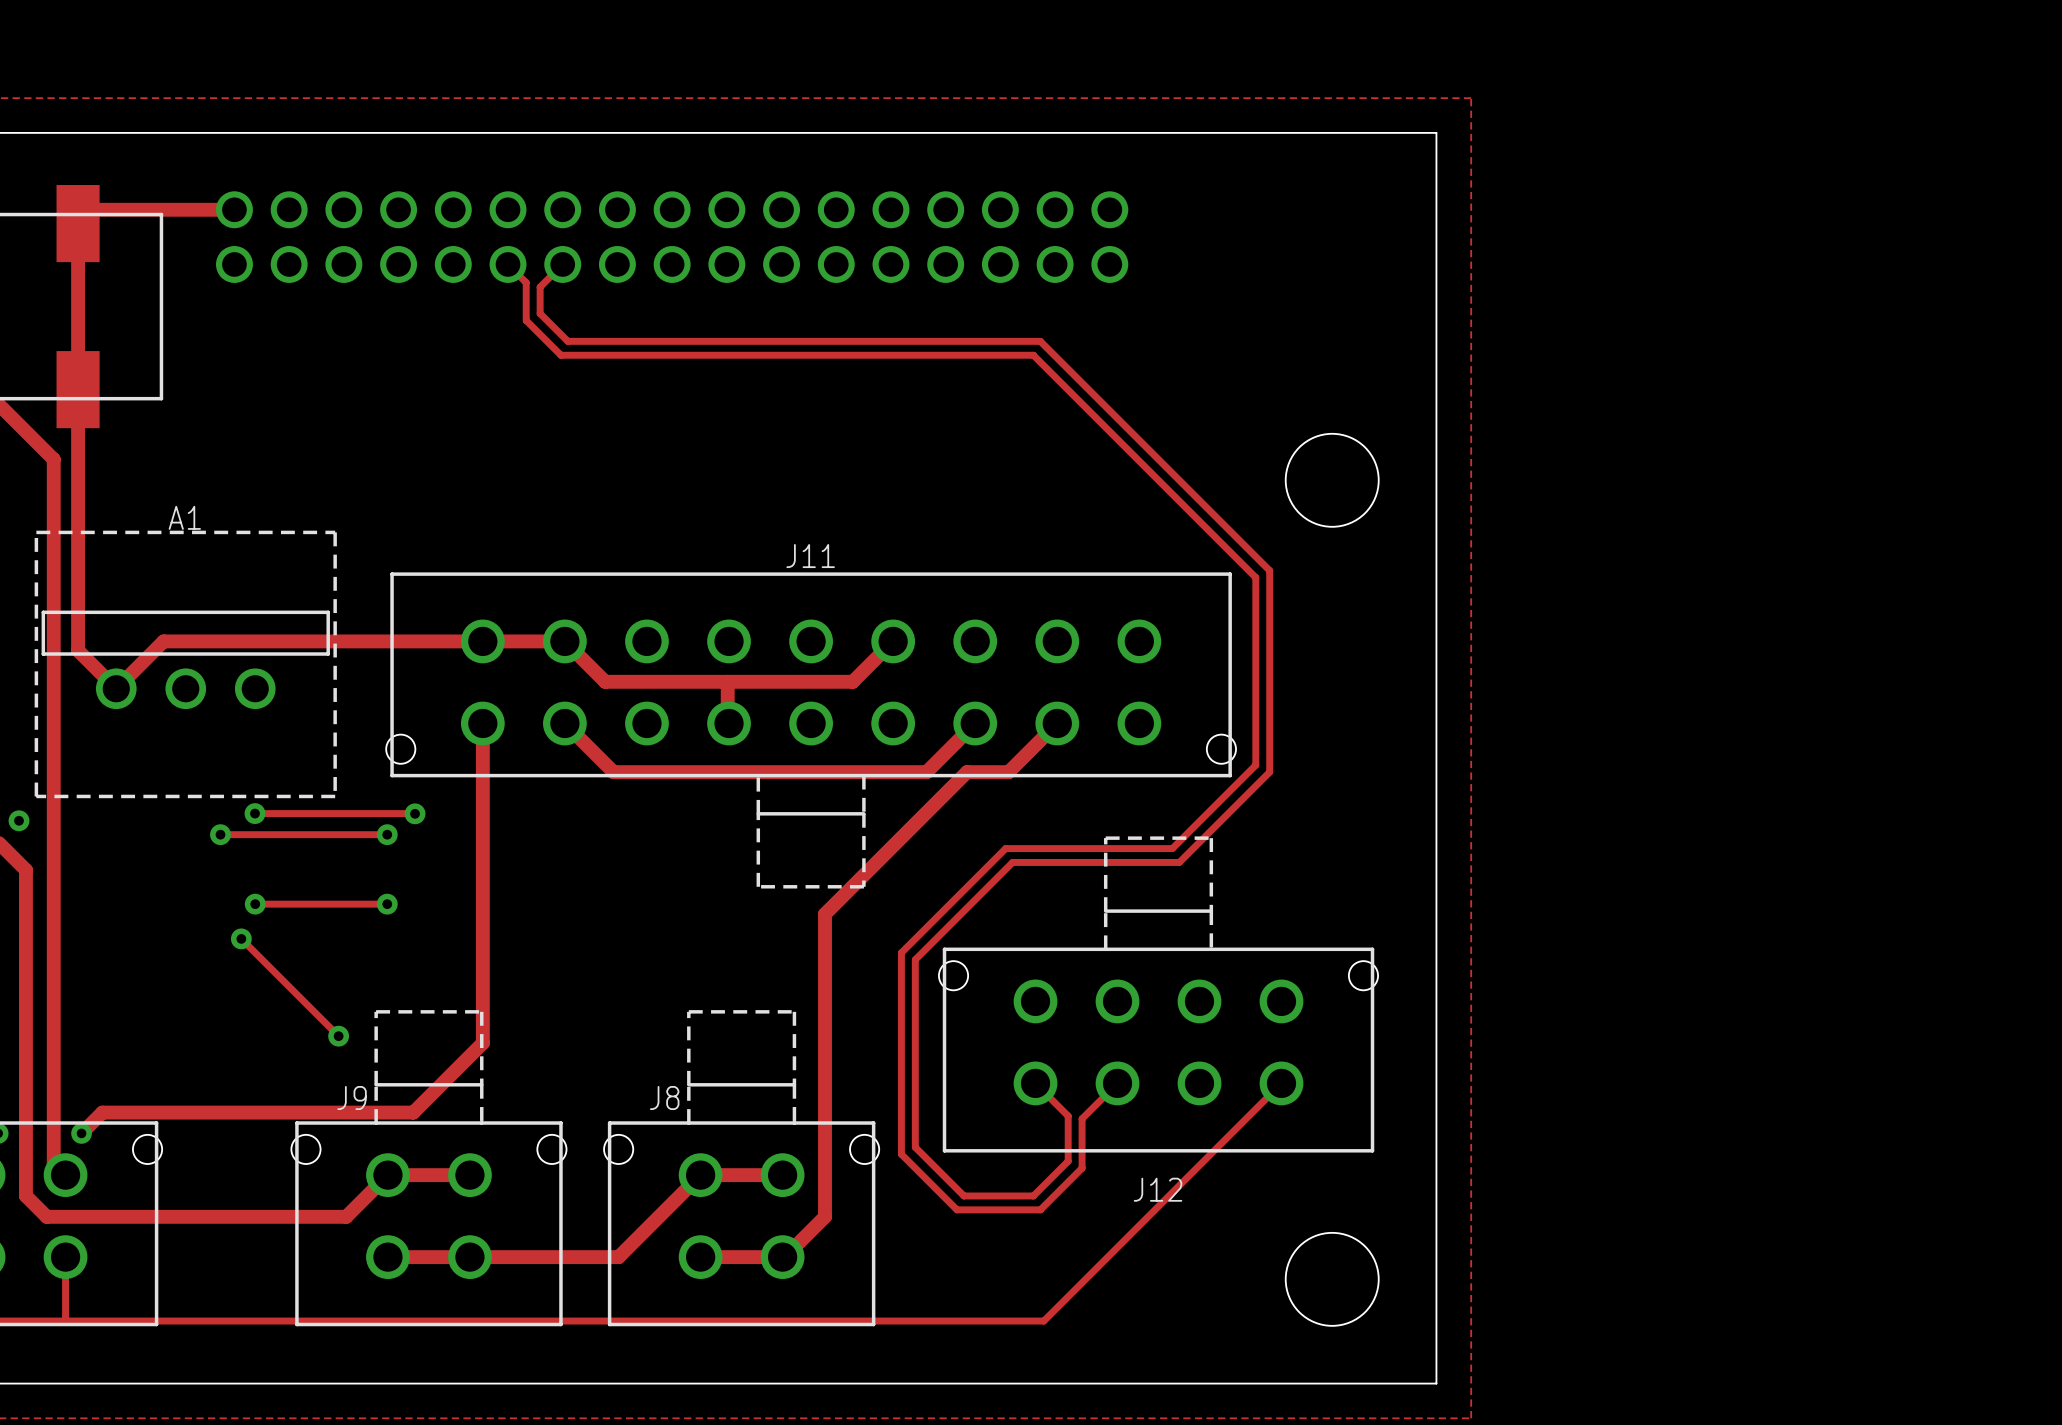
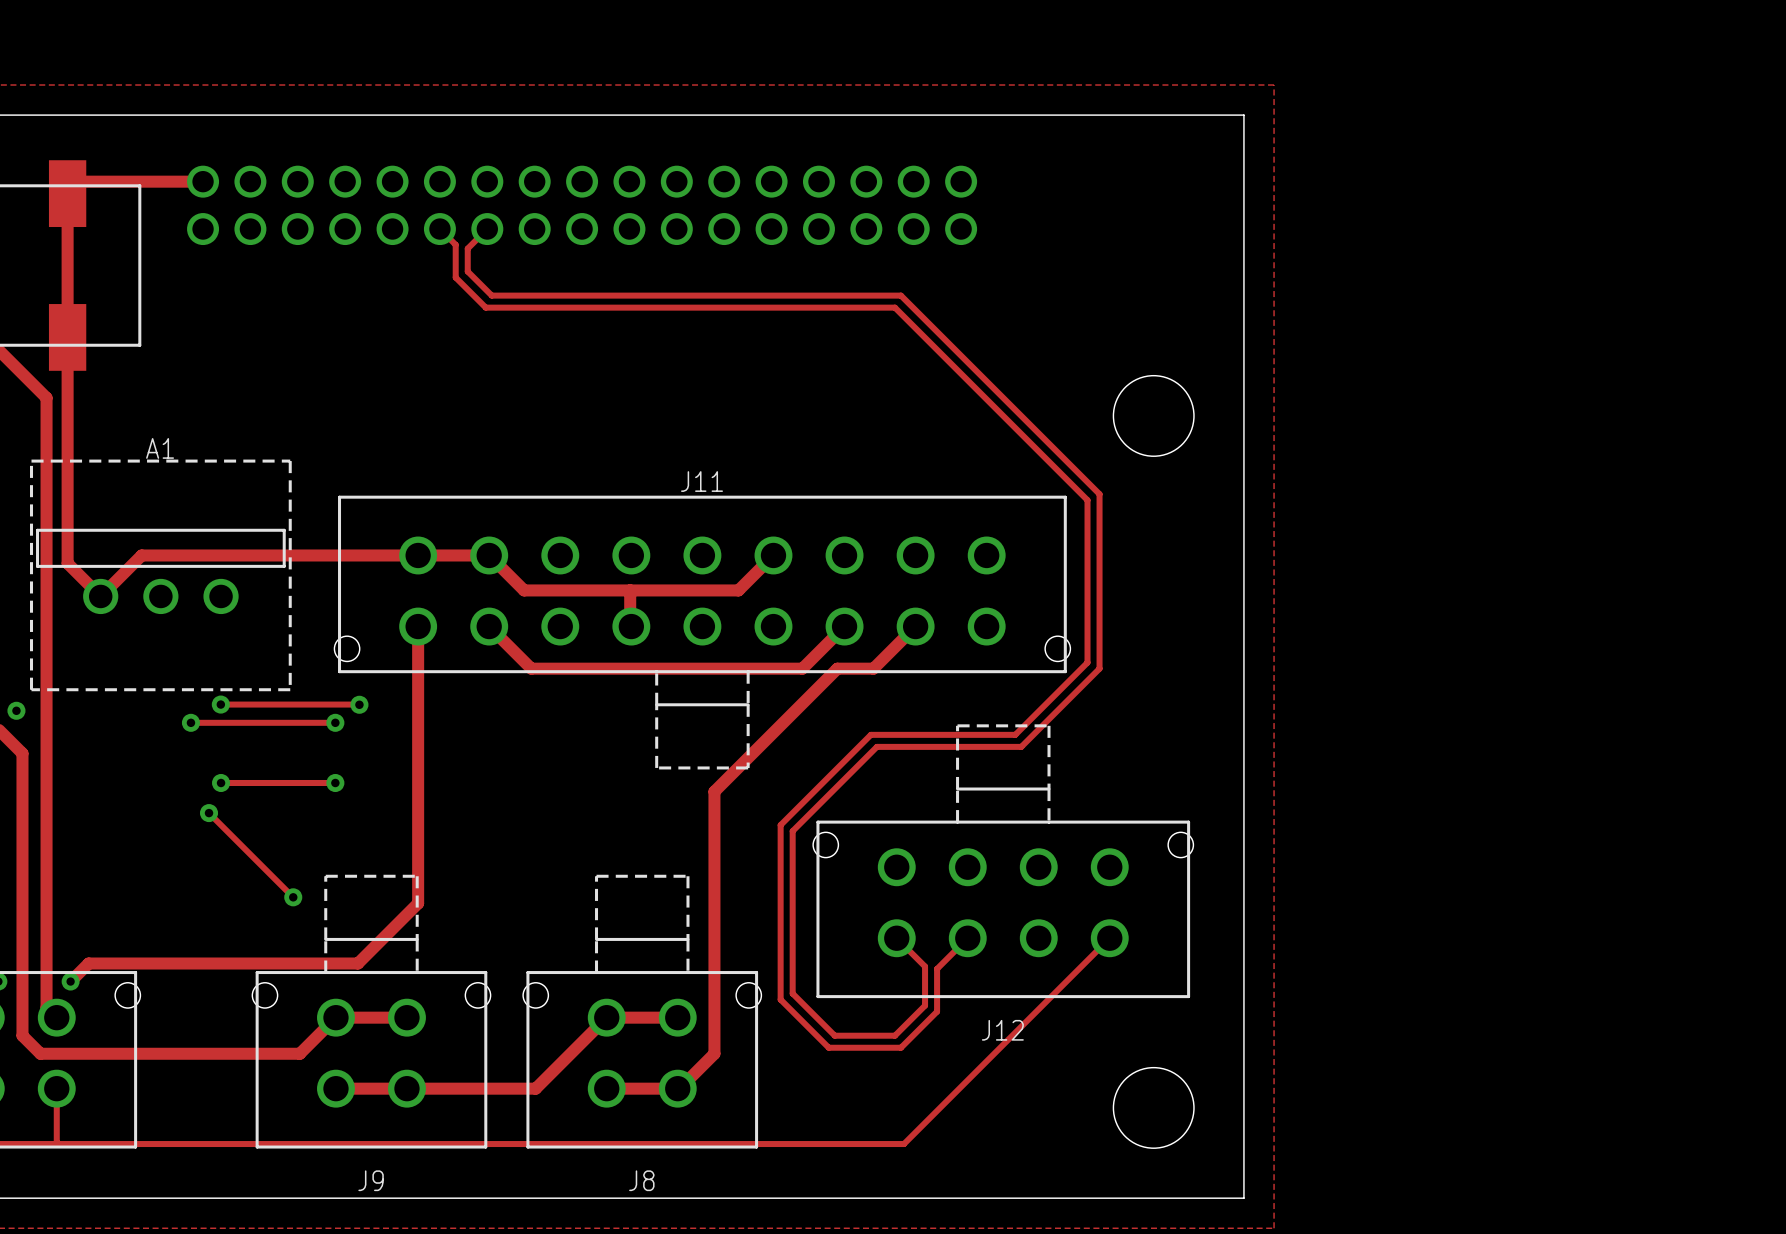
J9 name position: J9 (352, 1098) -> J9 (371, 1180)
J8 name position: J8 (664, 1098) -> J8 (641, 1180)

